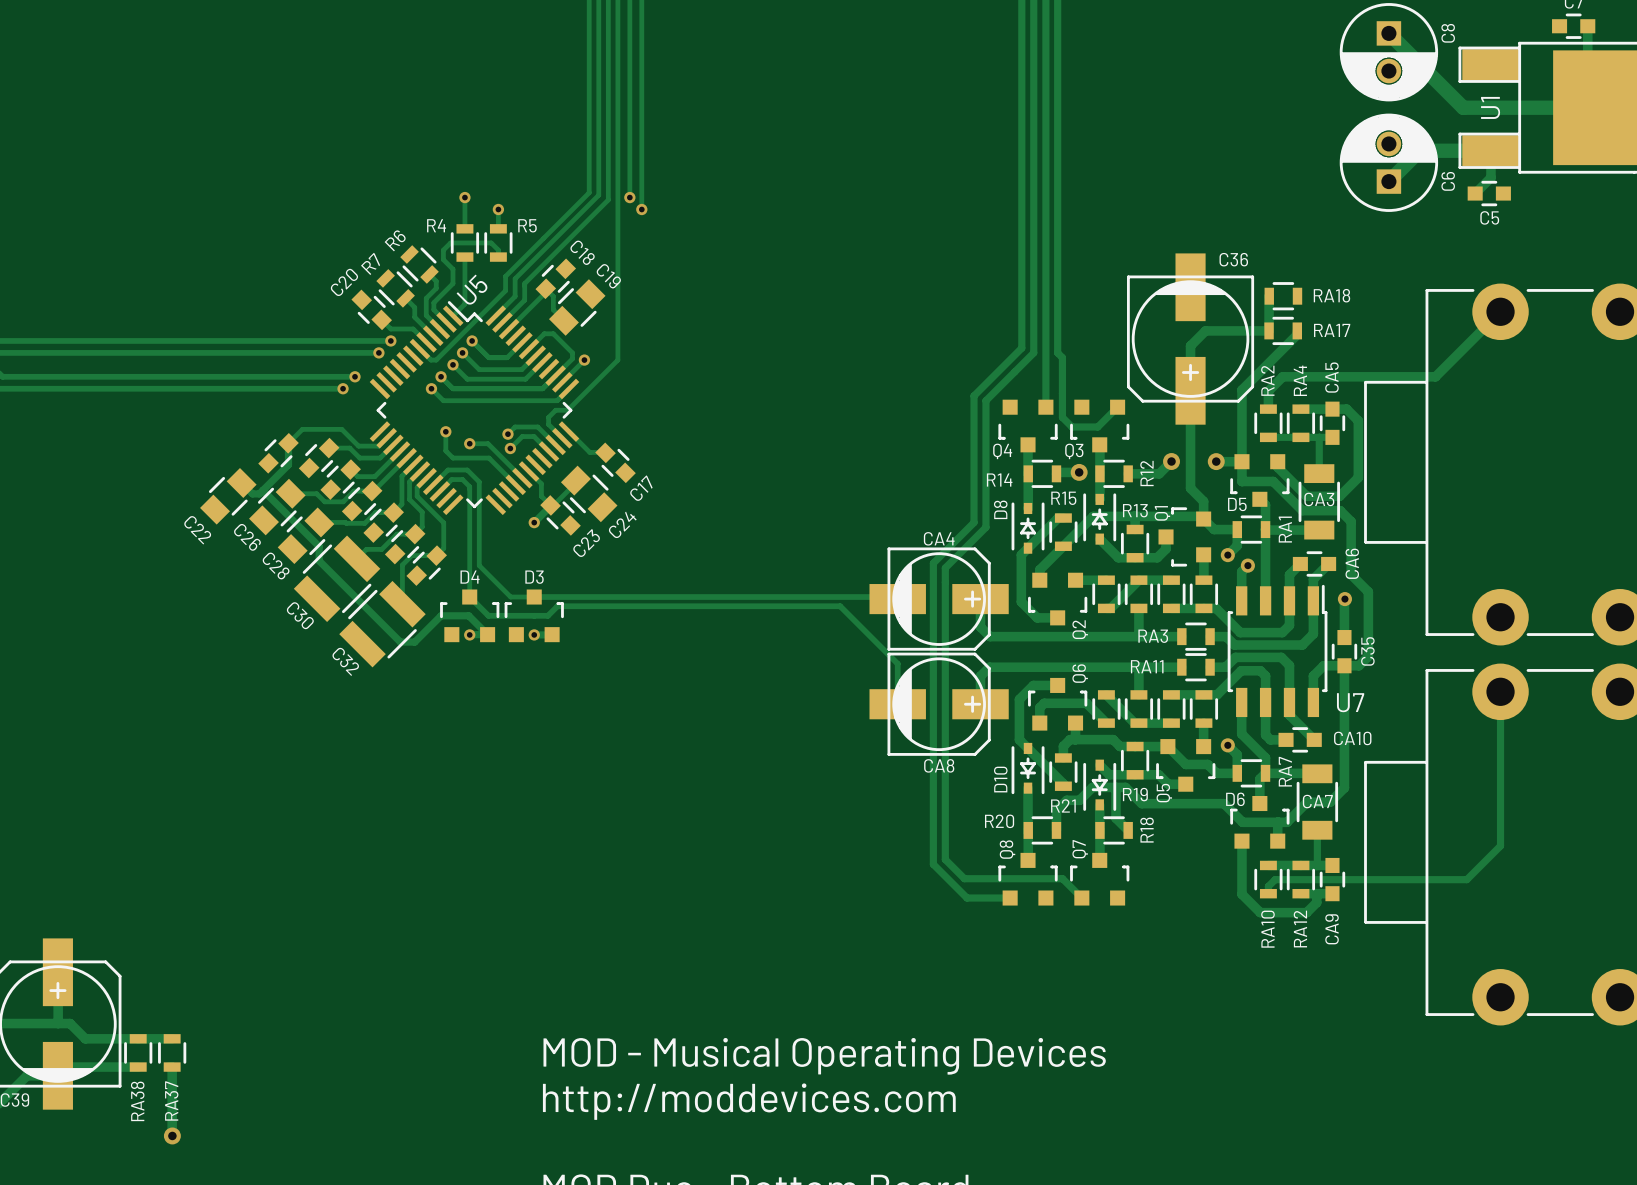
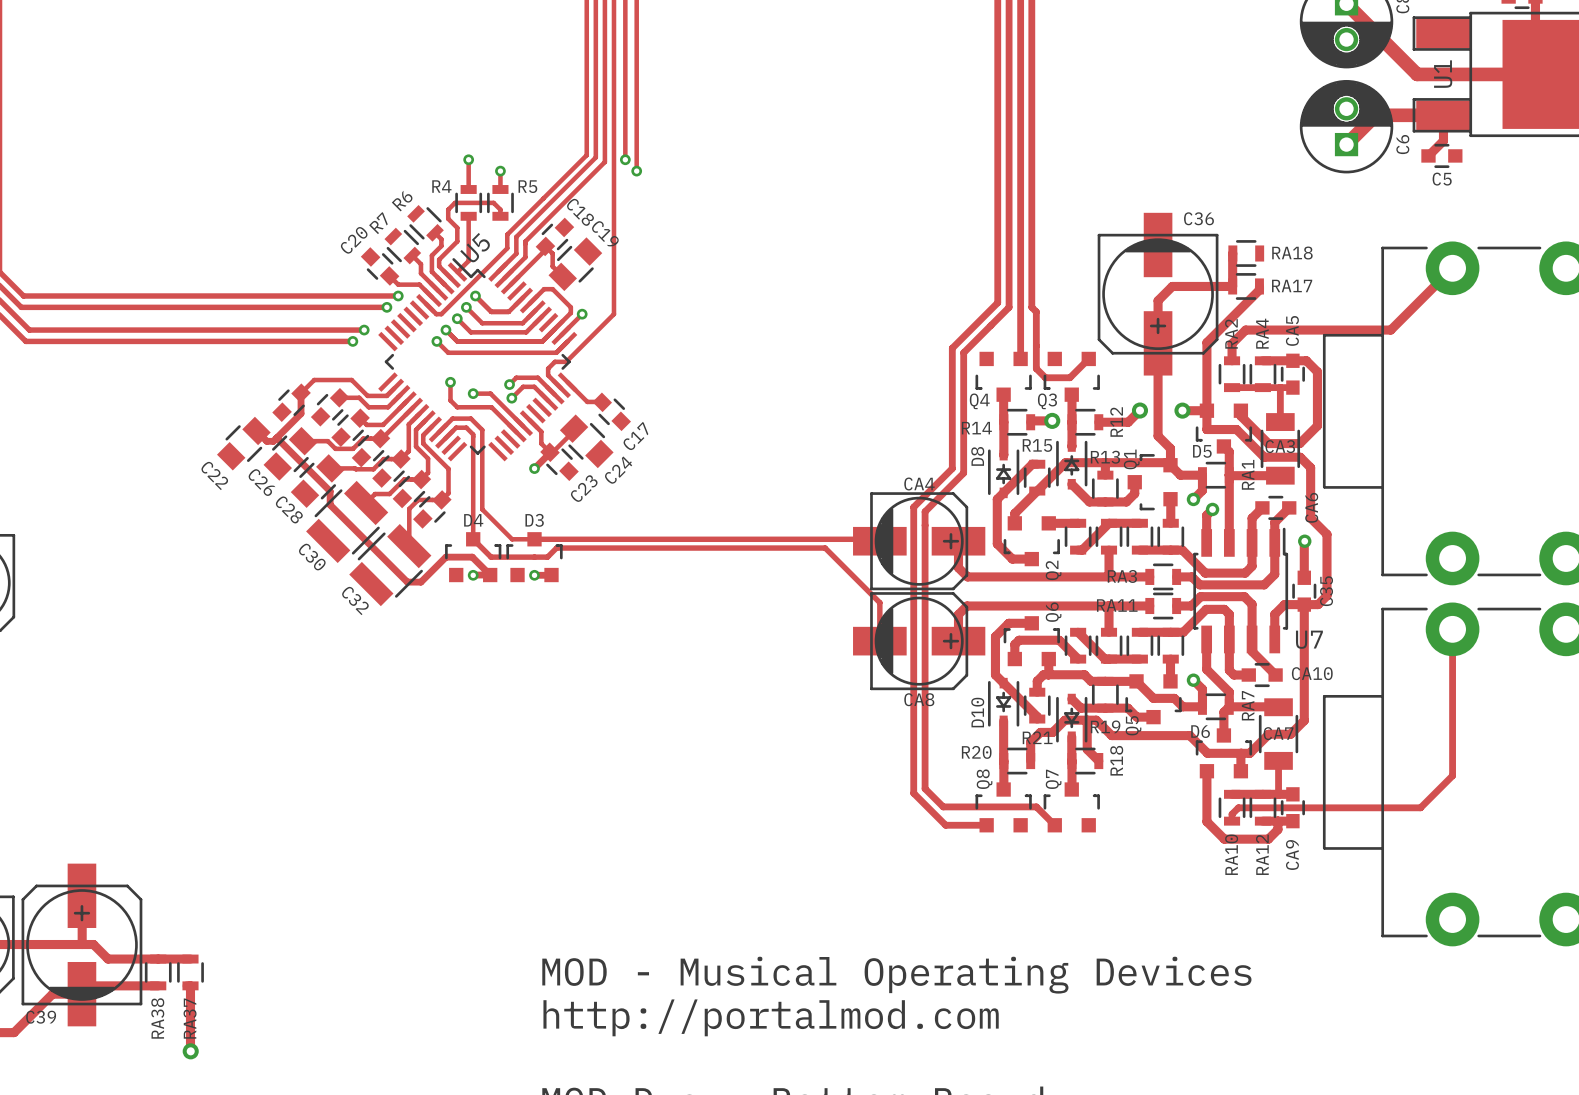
text: http://moddevices.com (749, 1101) -> http://portalmod.com (771, 1017)

